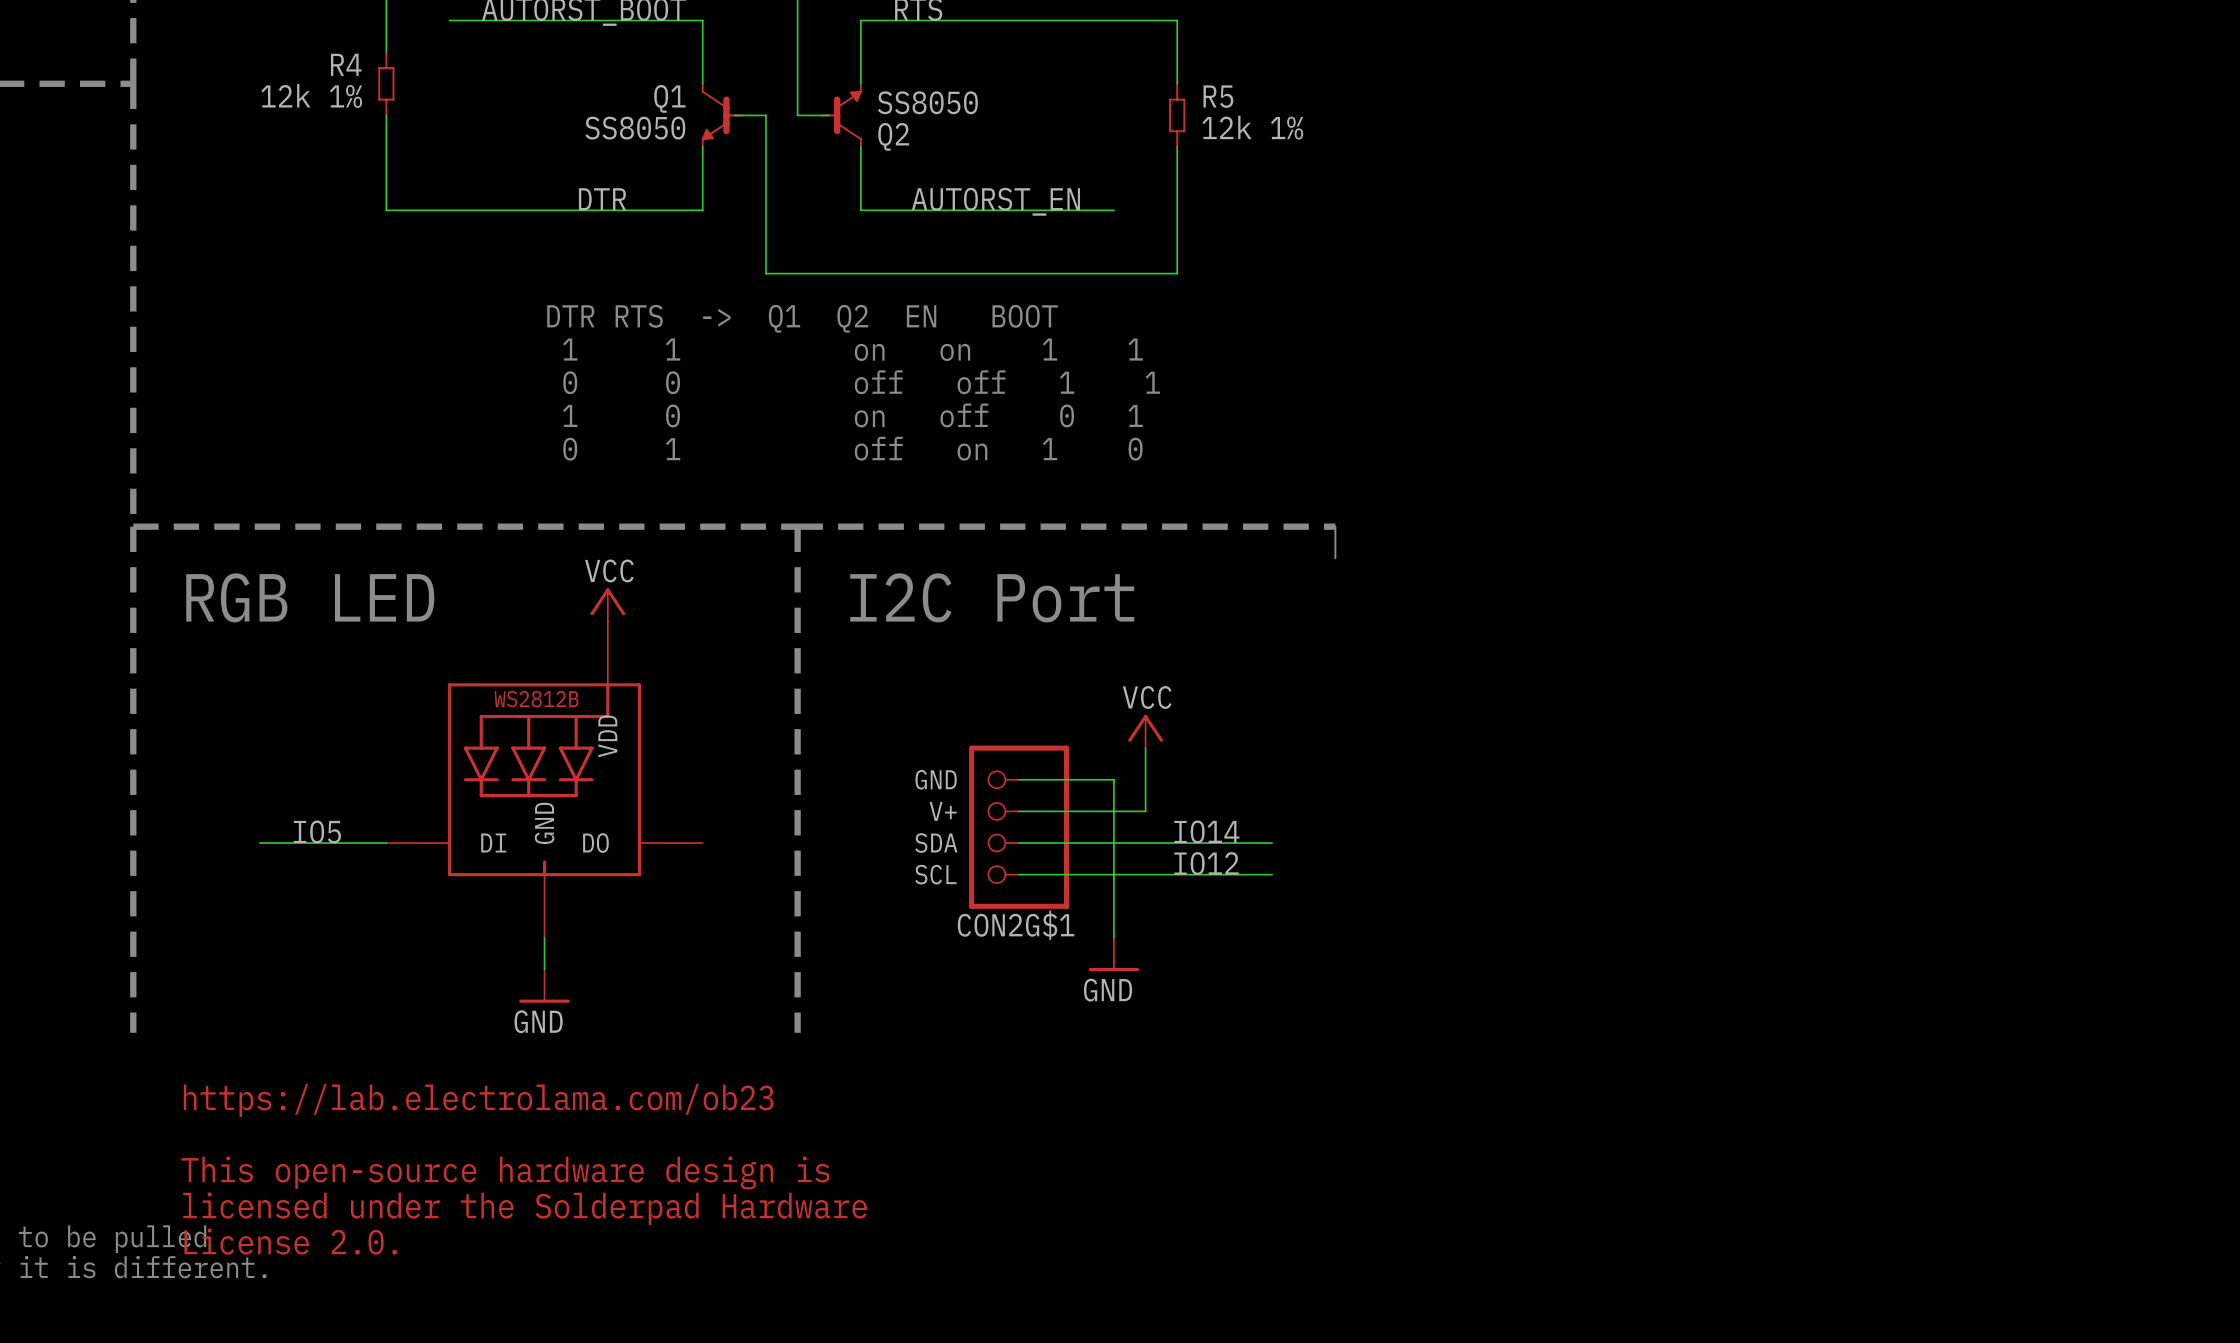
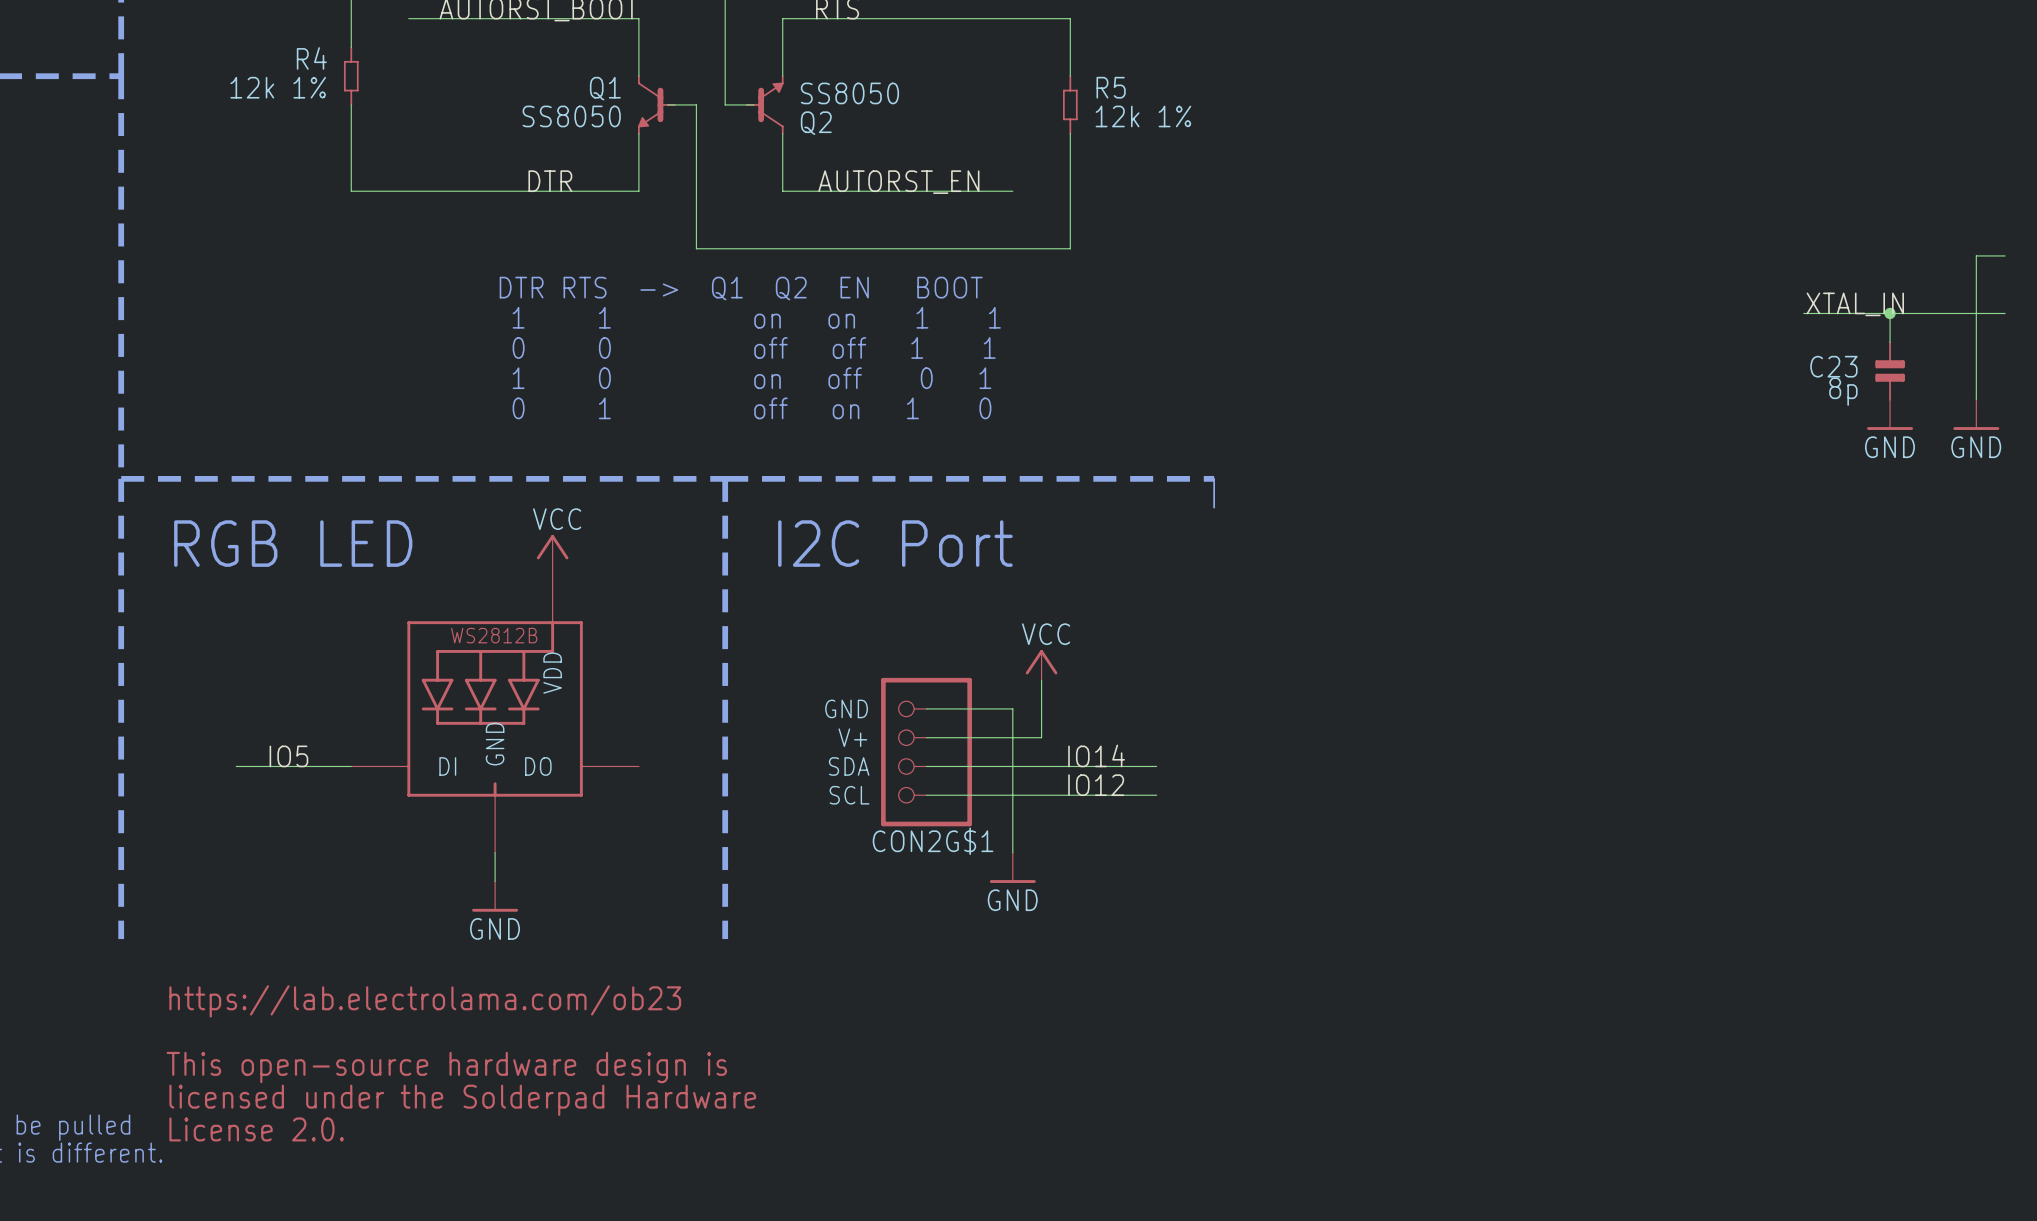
wire: none -> (2005, 255) (1976, 255) (1976, 399)
label: none -> XTAL_IN (1855, 304)
wire: none -> (1803, 313) (2005, 313)
wire: none -> (1890, 313) (1890, 342)
junction: none -> (1890, 313)
C23: none -> 8p (1890, 371)
power symbol: none -> GND (1890, 414)
power symbol: none -> GND (1976, 414)

